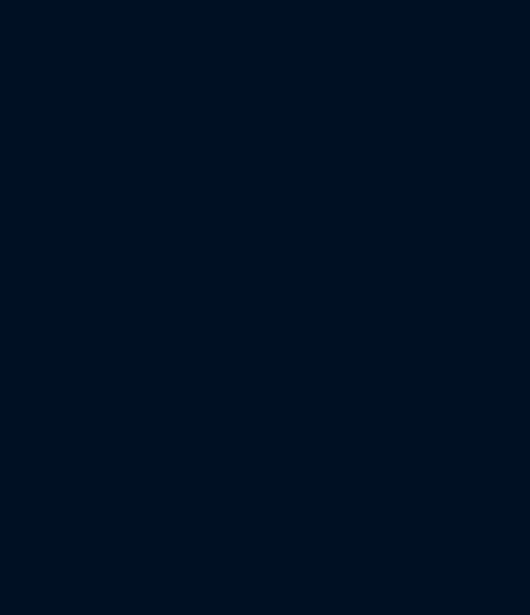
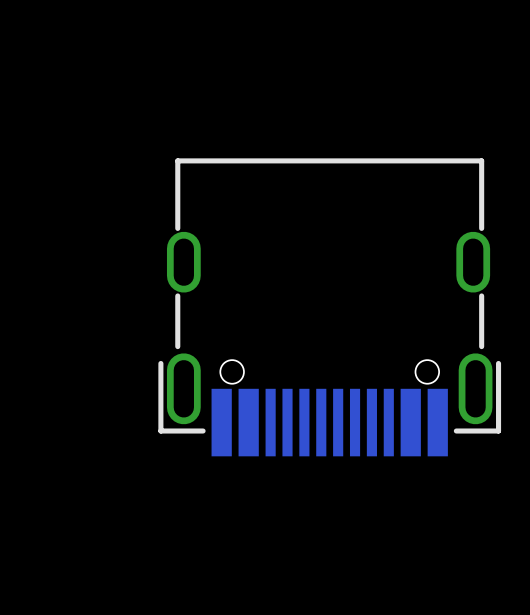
part: none -> (329, 307)

